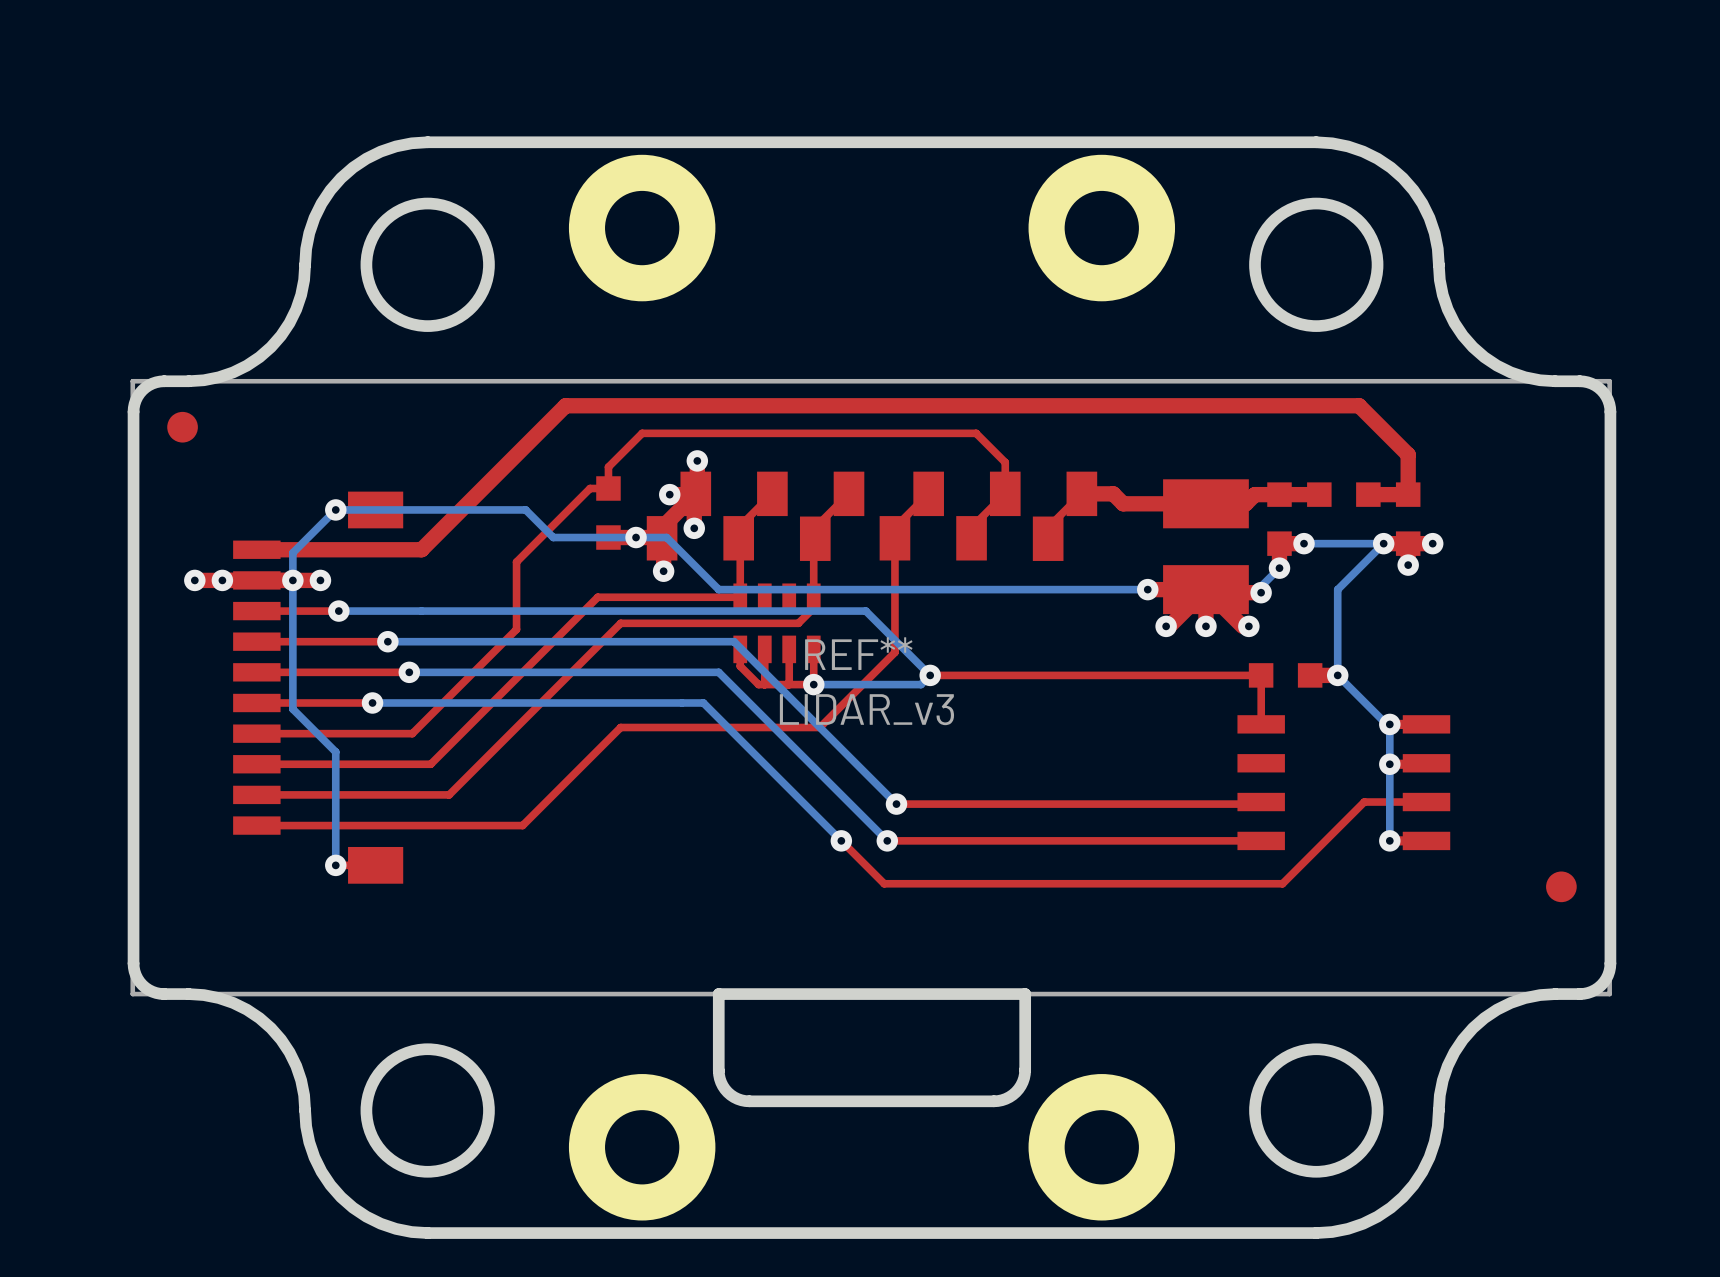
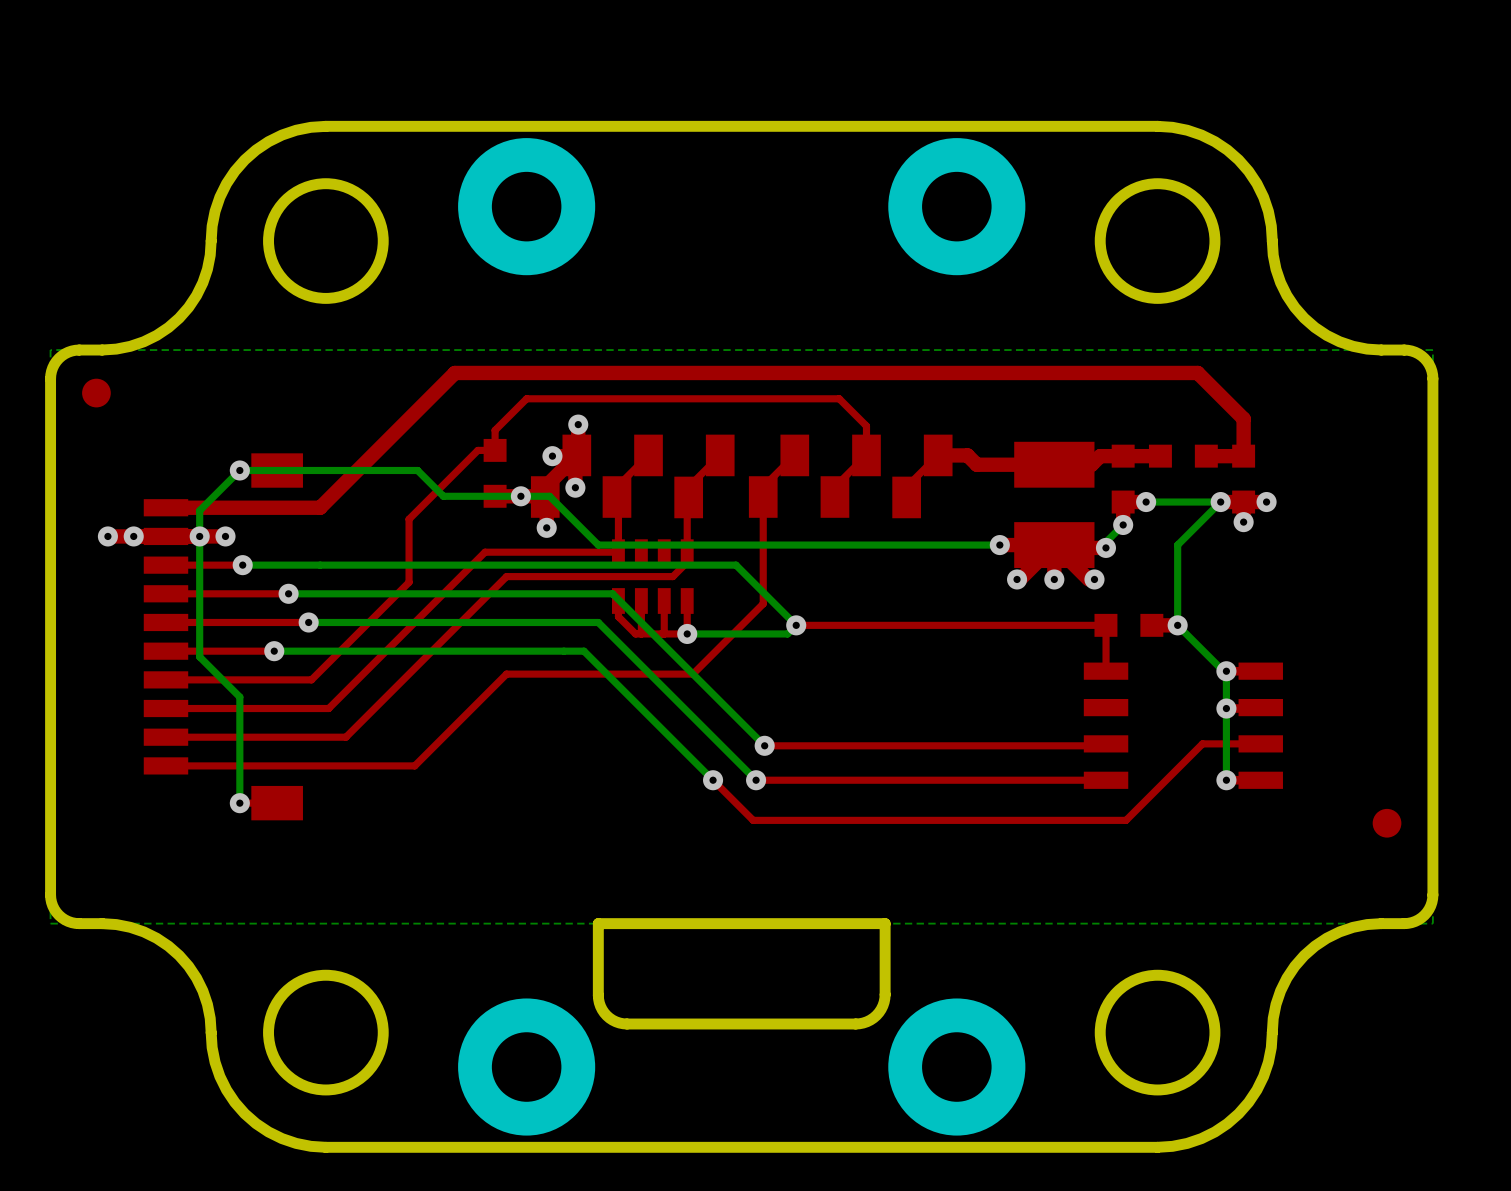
REF**: LIDAR_v3 (871, 687) -> none

